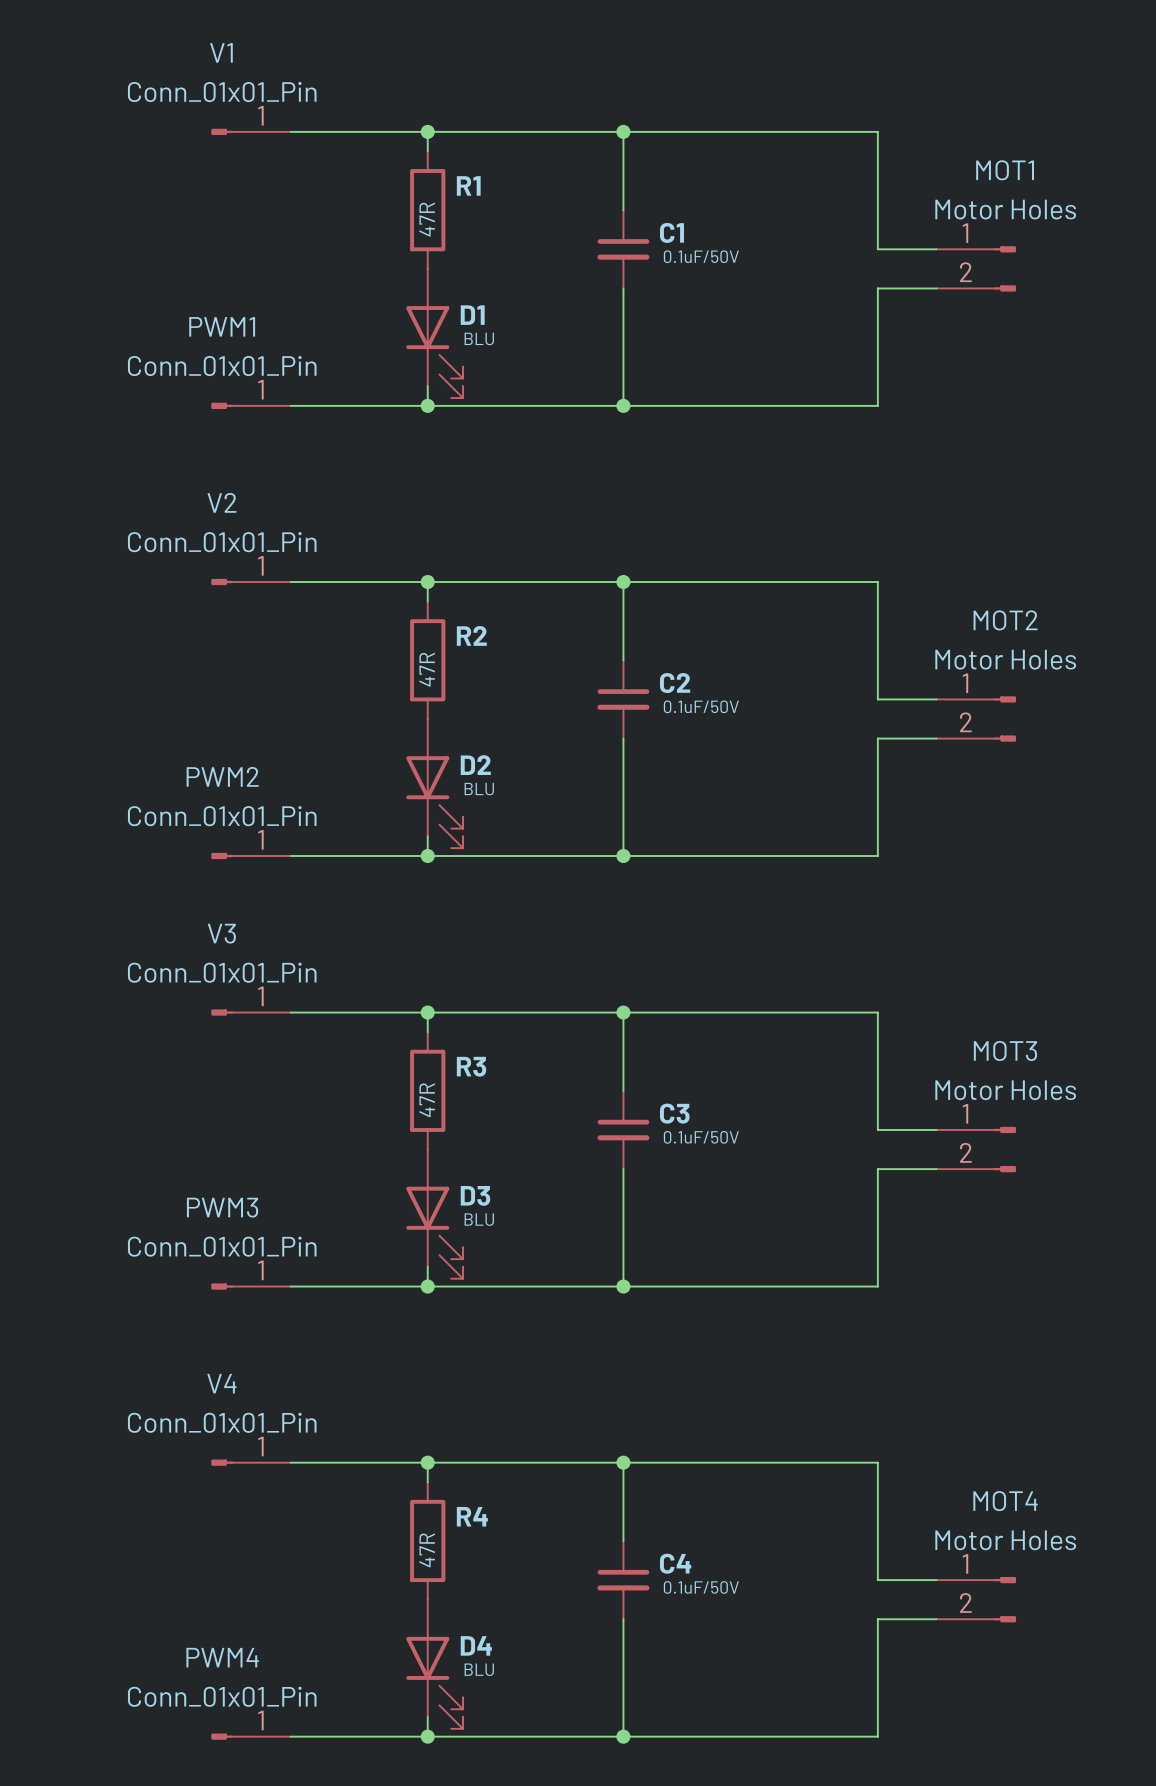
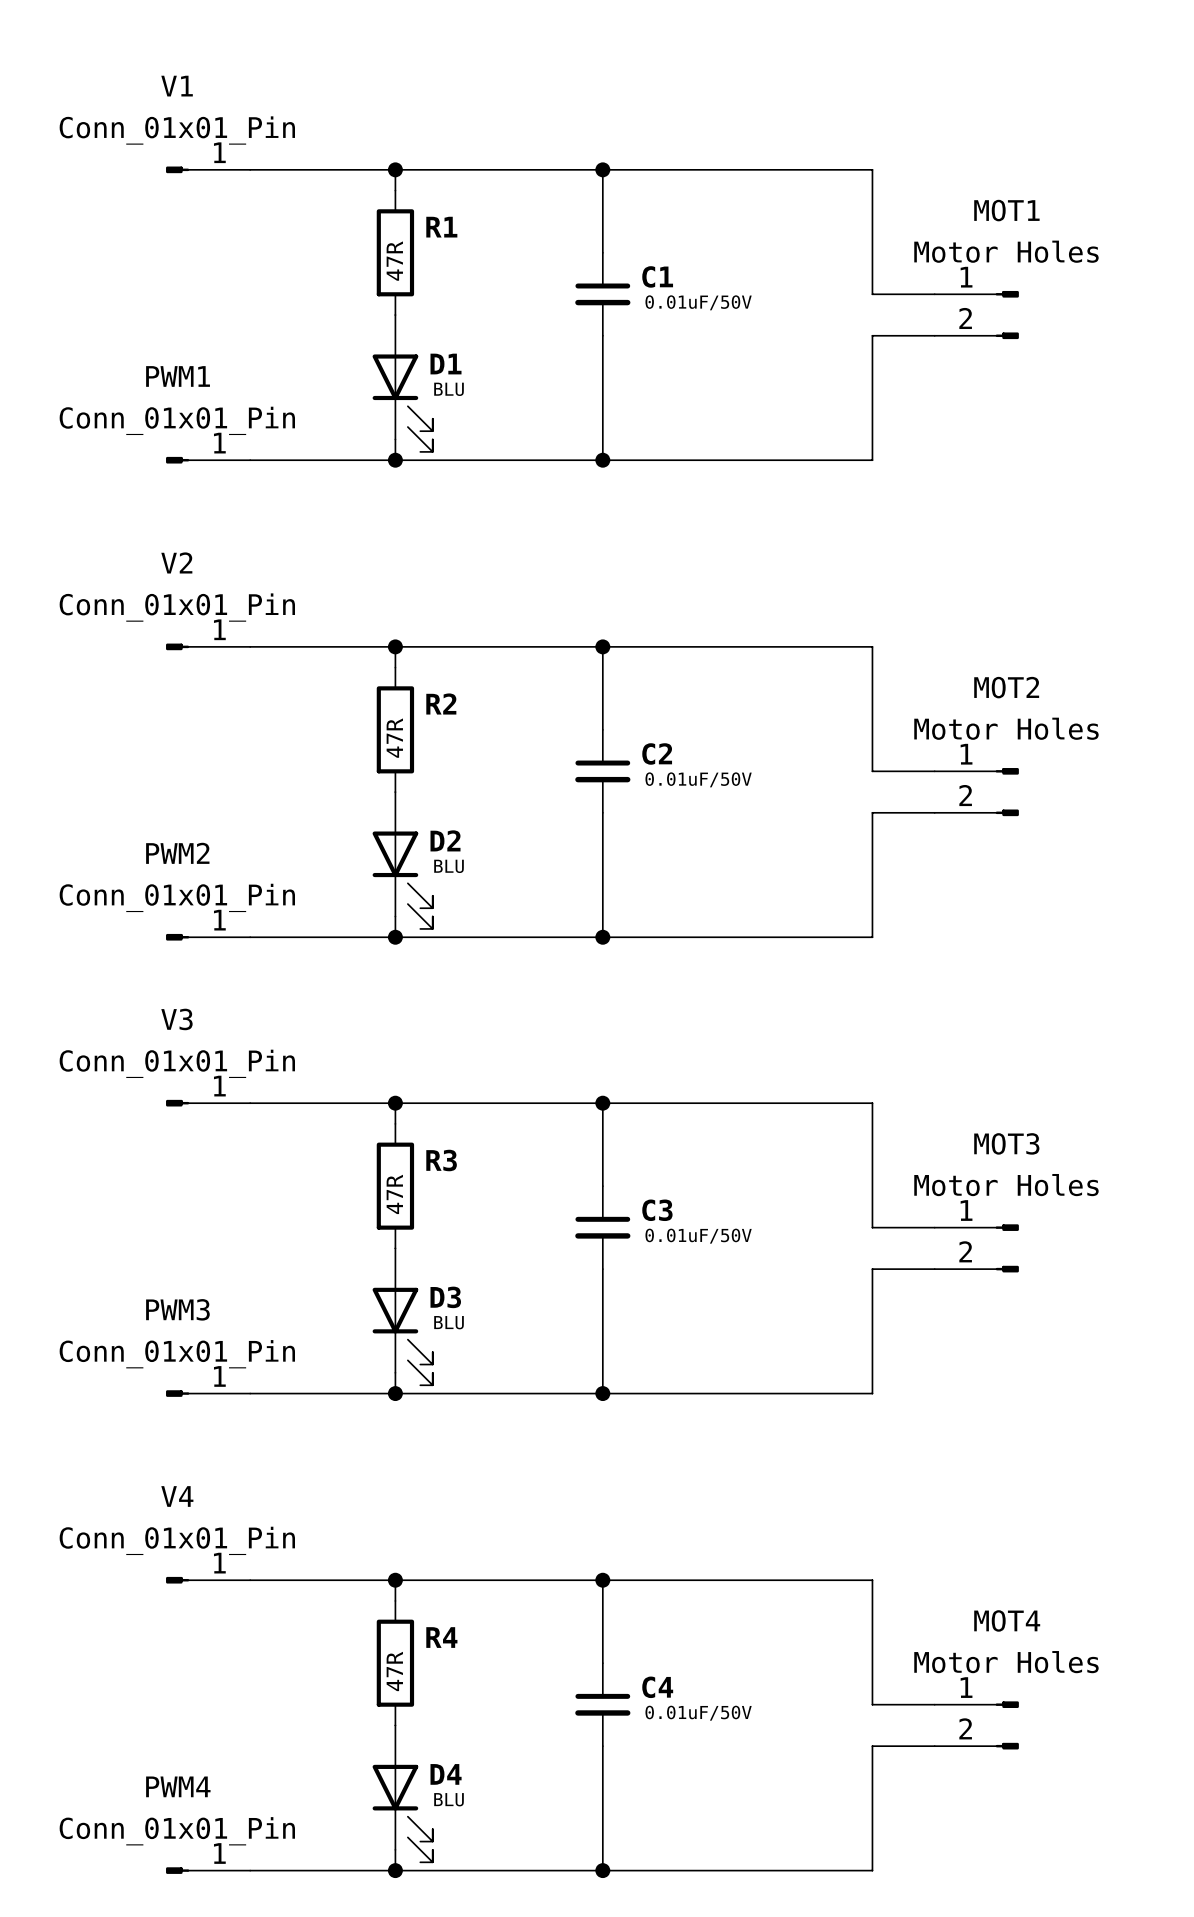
C1 value: 0.1uF/50V (701, 256) -> 0.01uF/50V (698, 302)
C2 value: 0.1uF/50V (701, 706) -> 0.01uF/50V (698, 779)
C3 value: 0.1uF/50V (701, 1137) -> 0.01uF/50V (698, 1236)
C4 value: 0.1uF/50V (701, 1587) -> 0.01uF/50V (698, 1713)

